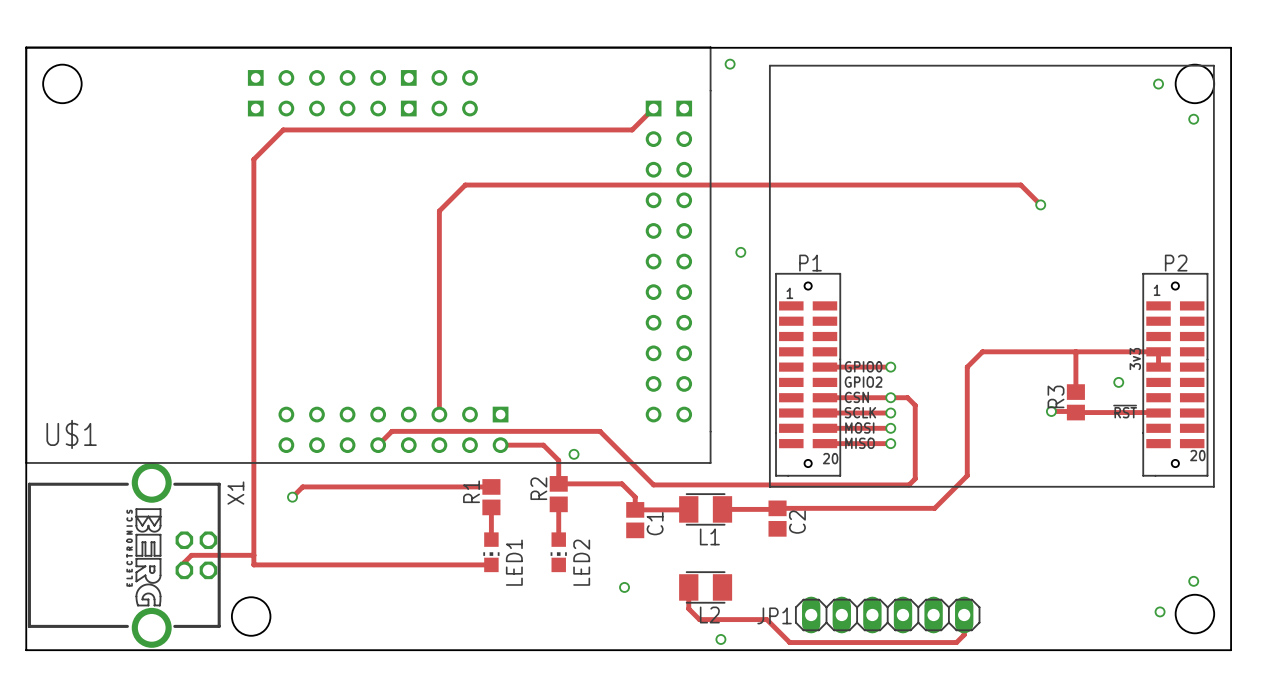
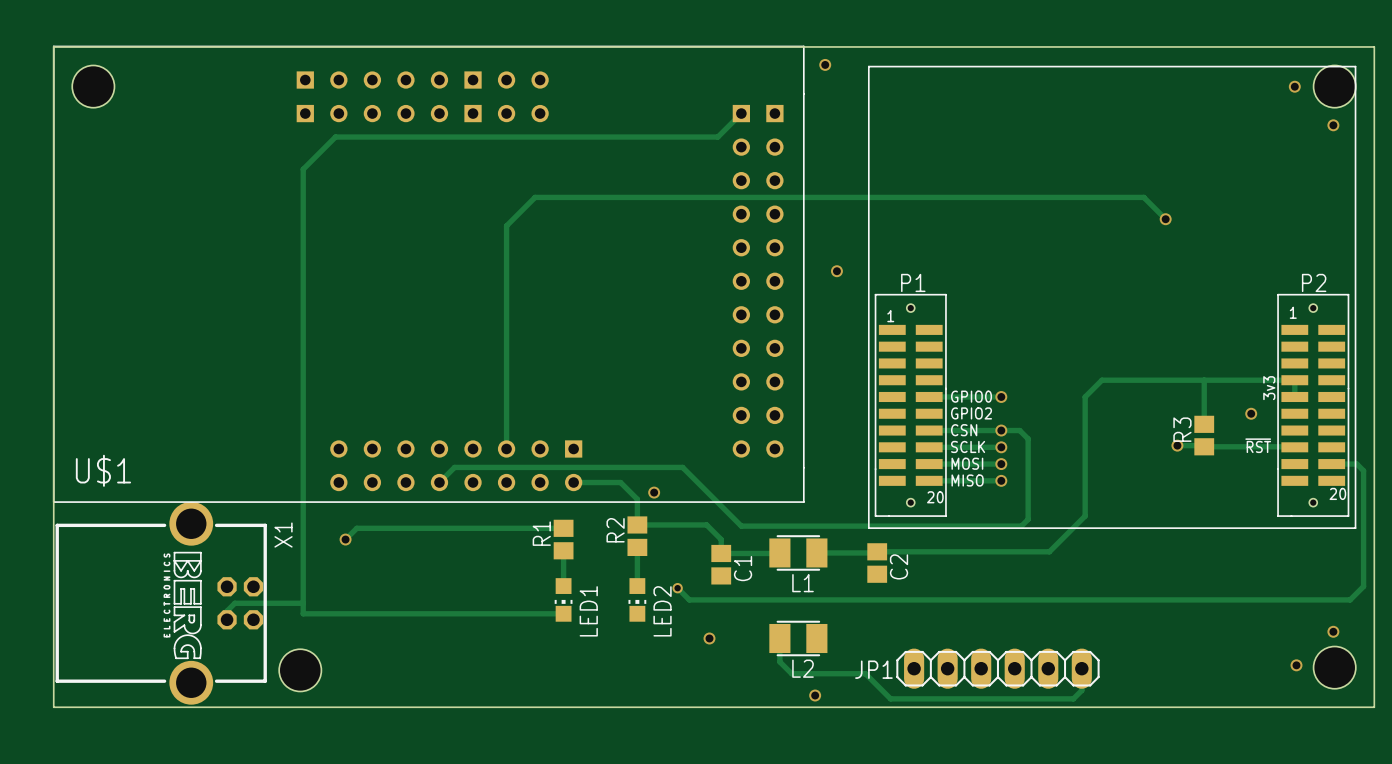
track: none -> (1331, 464) (1356, 464) (1363, 470) (1363, 586) (1350, 599) (689, 599) (677, 588)
via: none -> (677, 588)

